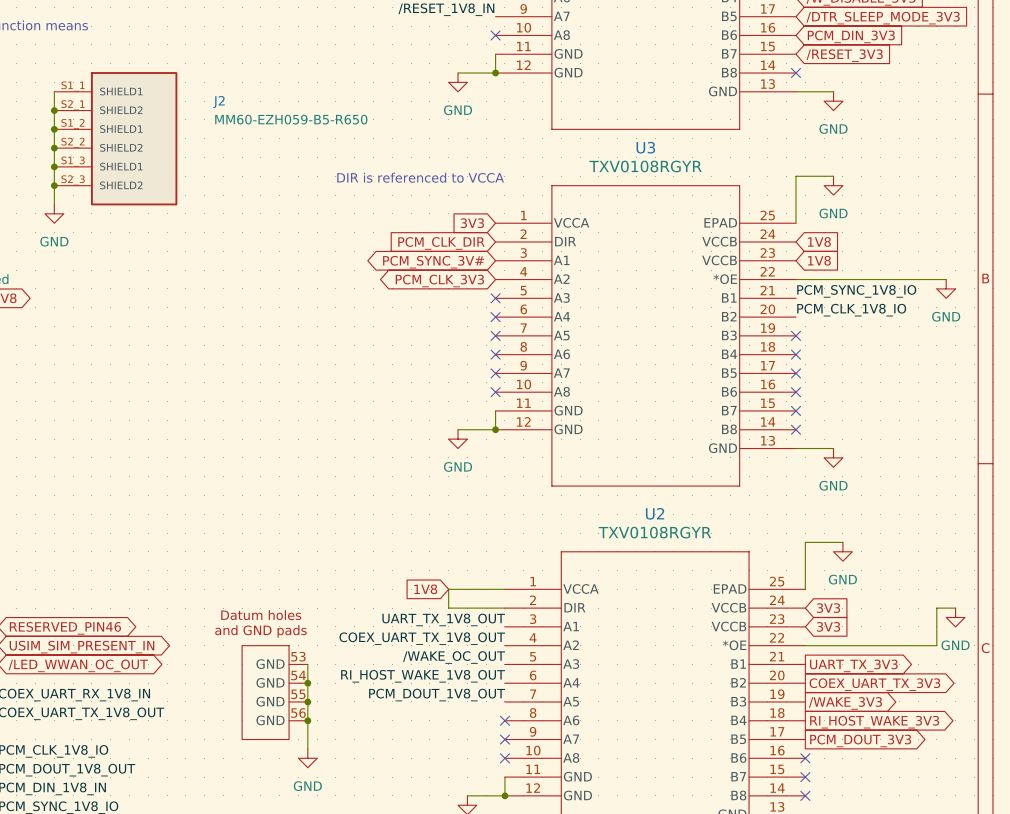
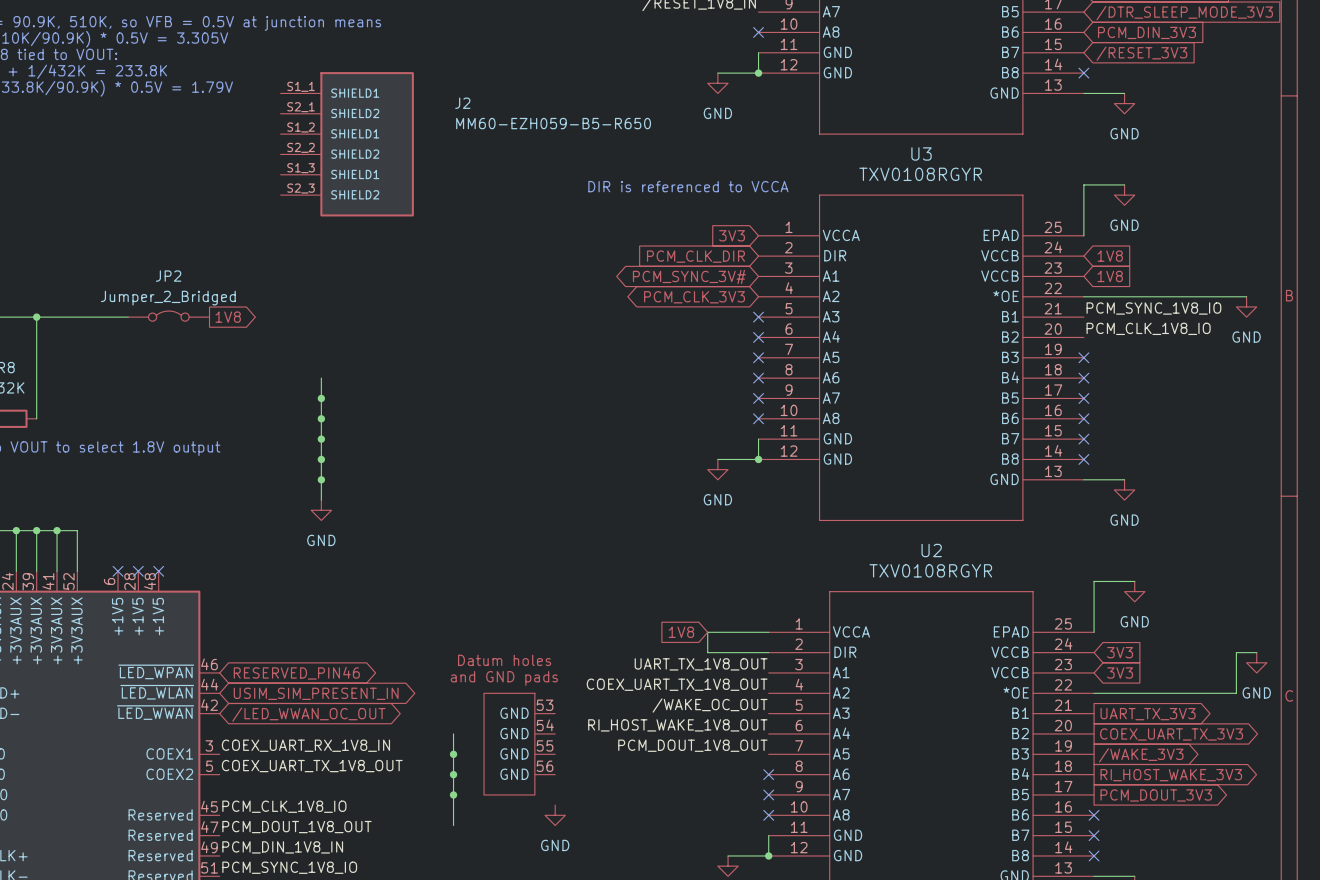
wire: (54, 91) (54, 204) -> none
junction: (54, 110) -> none
junction: (54, 129) -> none
junction: (54, 148) -> none
junction: (54, 166) -> none
junction: (54, 185) -> none
power symbol: GND (54, 213) -> none
wire: none -> (321, 378) (321, 500)
junction: none -> (321, 398)
junction: none -> (321, 418)
junction: none -> (321, 439)
junction: none -> (321, 459)
junction: none -> (321, 479)
power symbol: none -> GND (321, 510)
wire: (307, 664) (307, 748) -> (453, 733) (453, 825)
junction: (307, 683) -> none
junction: none -> (453, 754)
junction: (307, 701) -> none
junction: none -> (453, 774)
junction: (307, 720) -> none
junction: none -> (453, 794)

